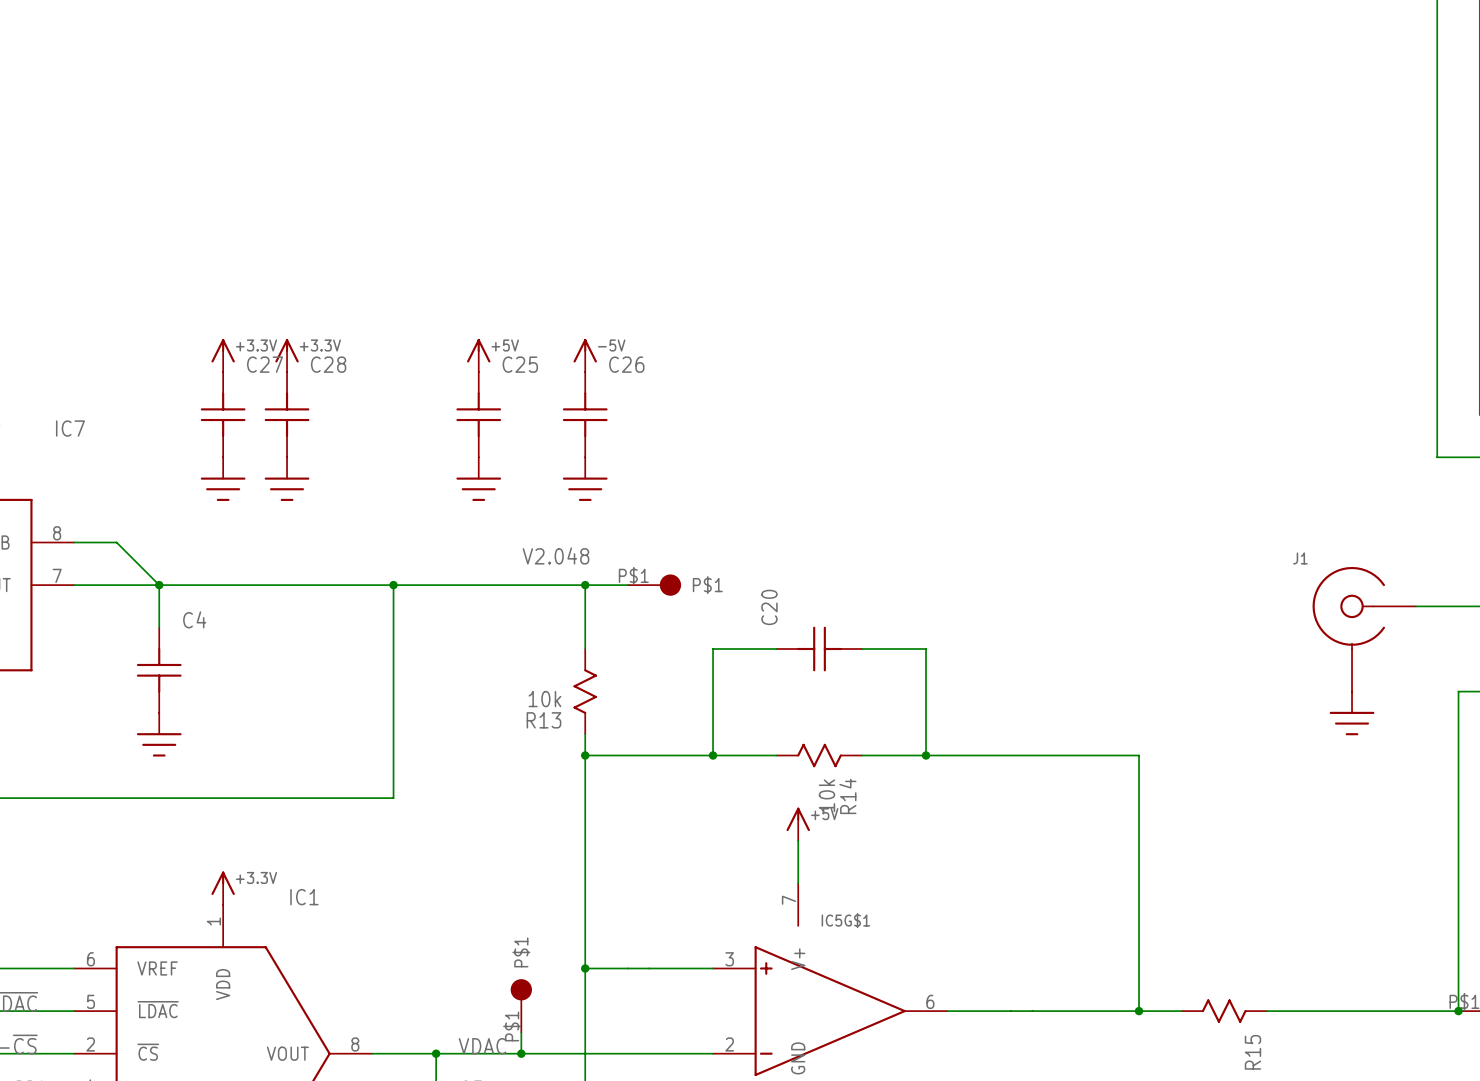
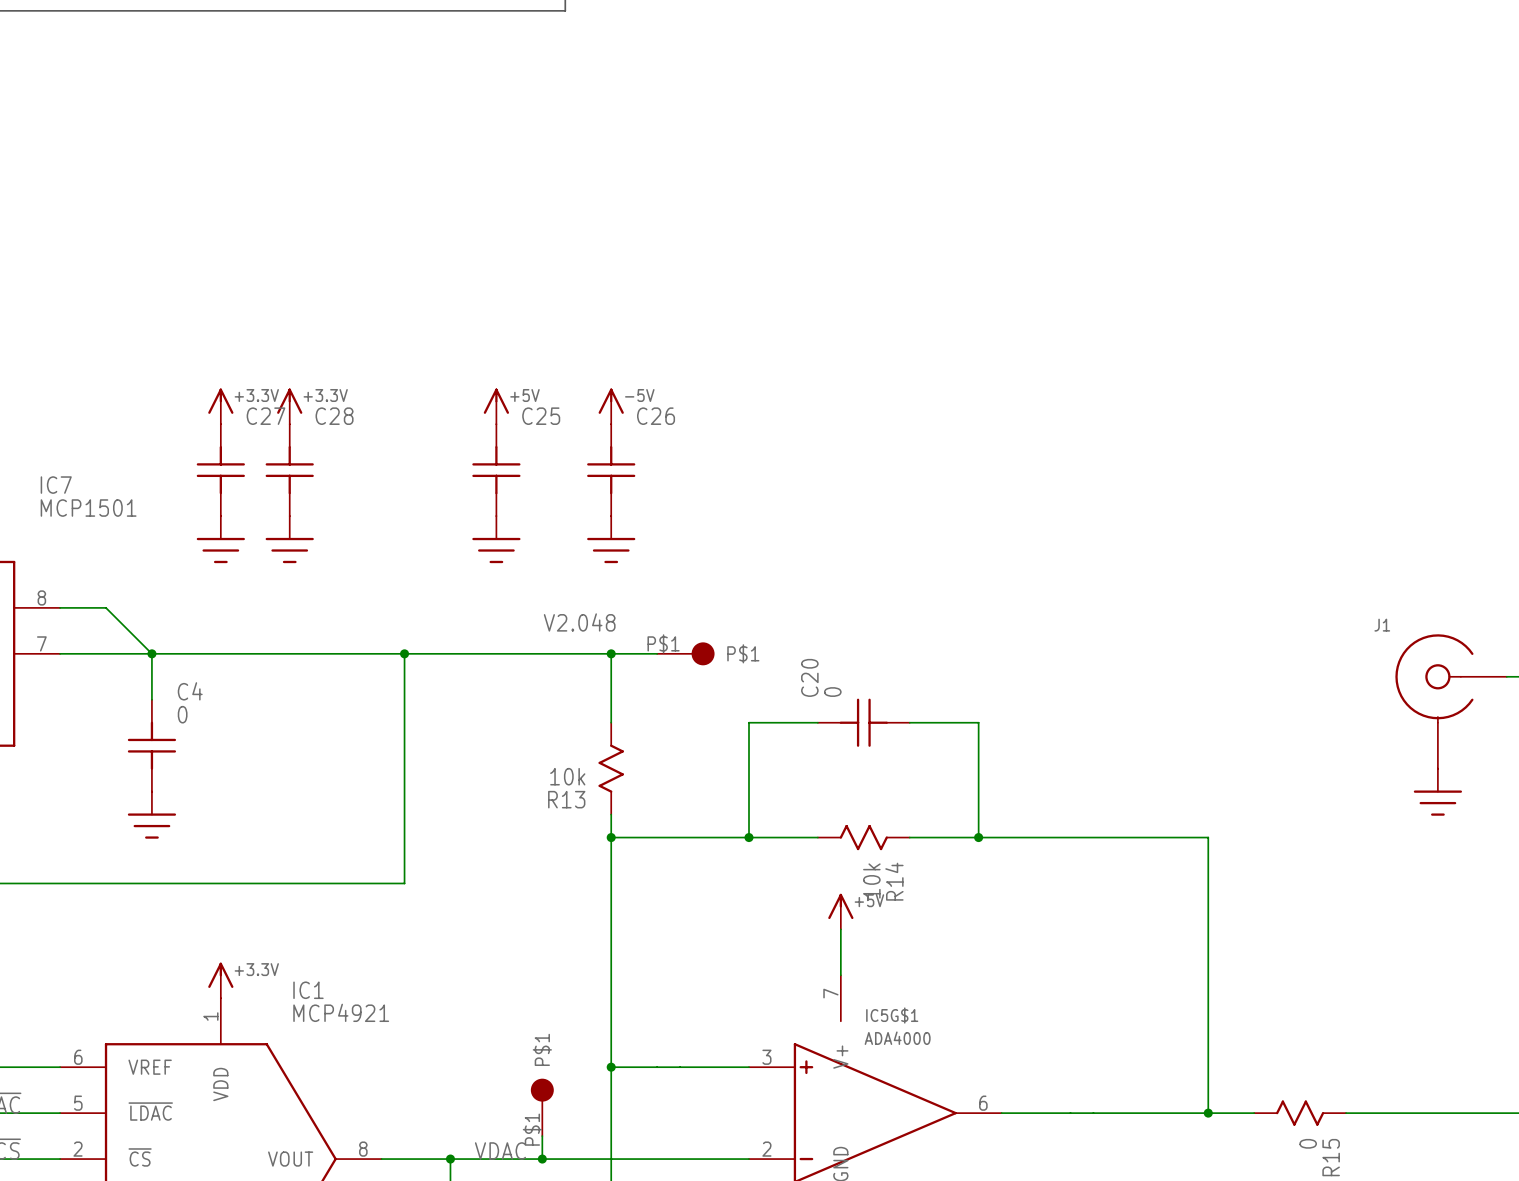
IC7 value: none -> MCP1501 (88, 508)
C20 value: none -> 0 (832, 692)
C4 value: none -> 0 (182, 714)
IC1 value: none -> MCP4921 (341, 1012)
IC5G$1 value: none -> ADA4000 (897, 1038)
R15 value: none -> 0 (1308, 1143)

